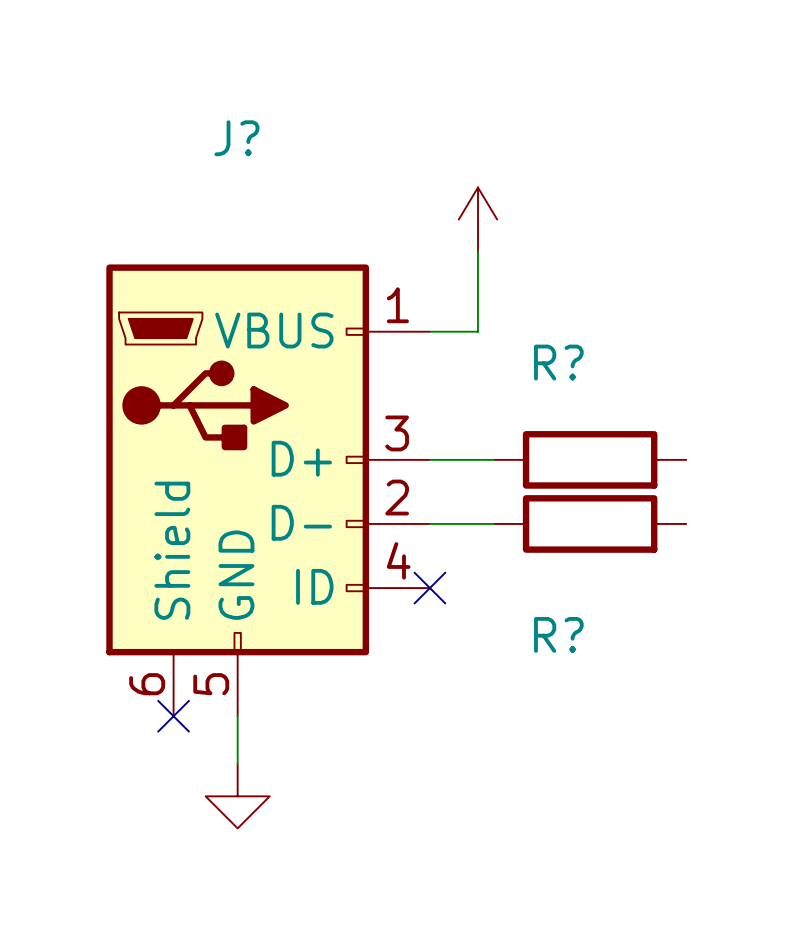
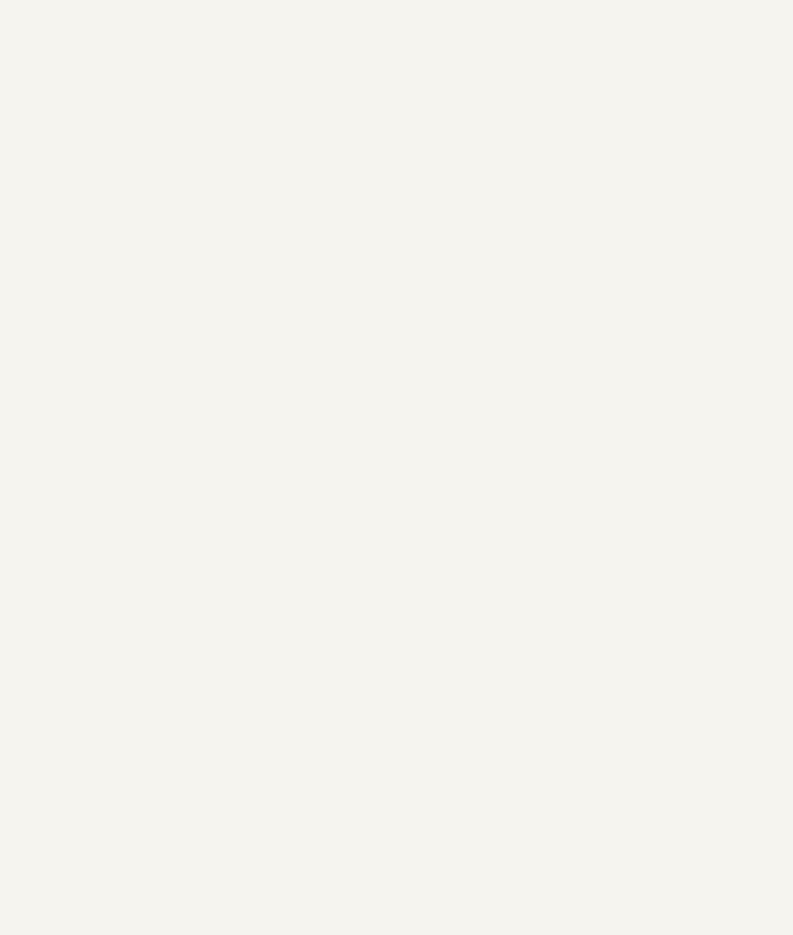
power symbol: (477, 219) -> none
wire: (477, 251) (477, 331) (429, 331) -> none
wire: (429, 459) (494, 459) -> none
R?: (590, 459) -> none
J?: (268, 490) -> none
wire: (429, 523) (494, 523) -> none
R?: (590, 523) -> none
no-connect mark: (429, 588) -> none
no-connect mark: (173, 716) -> none
wire: (237, 716) (237, 764) -> none
power symbol: (237, 796) -> none

